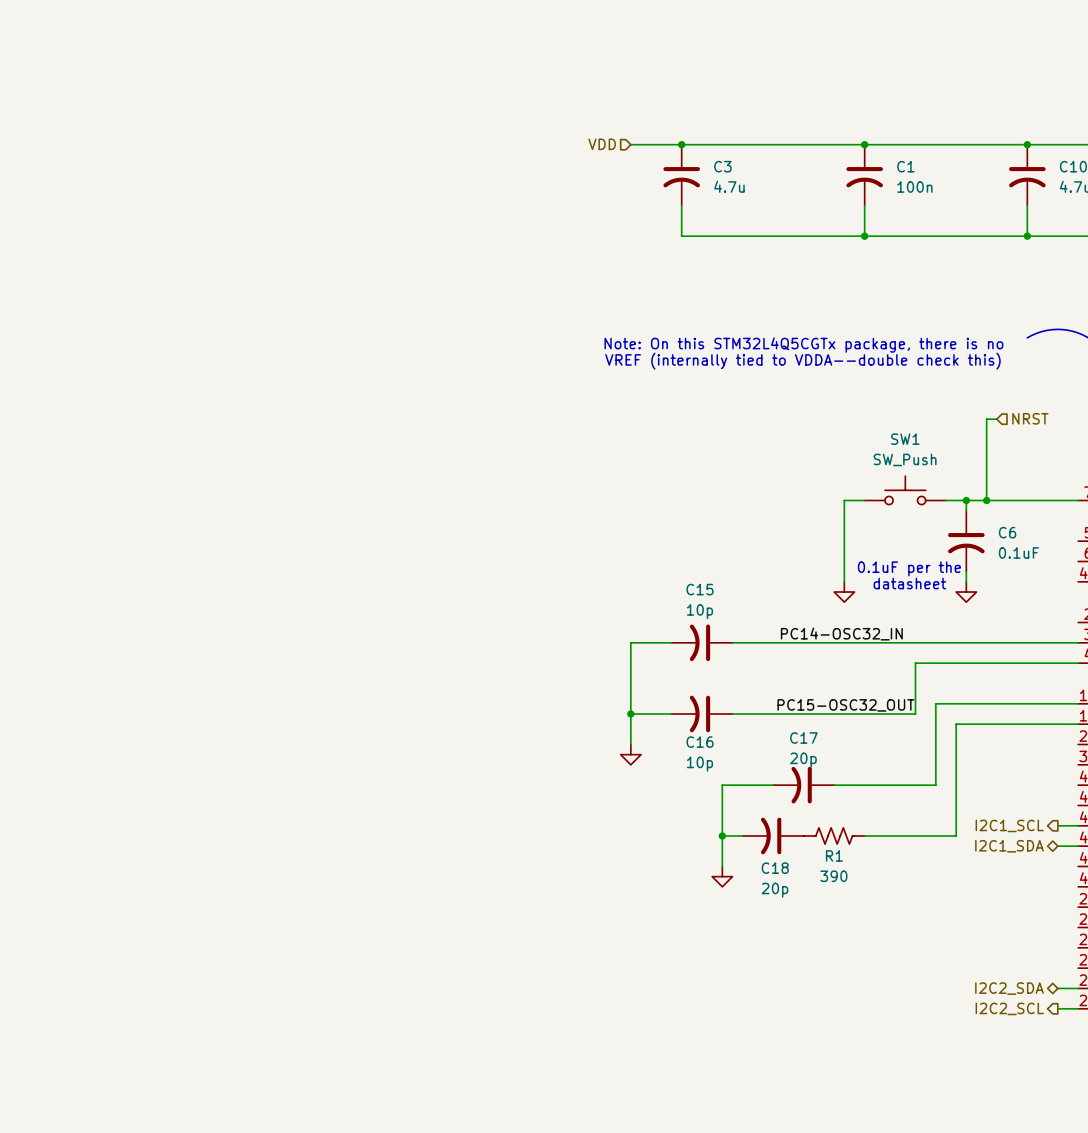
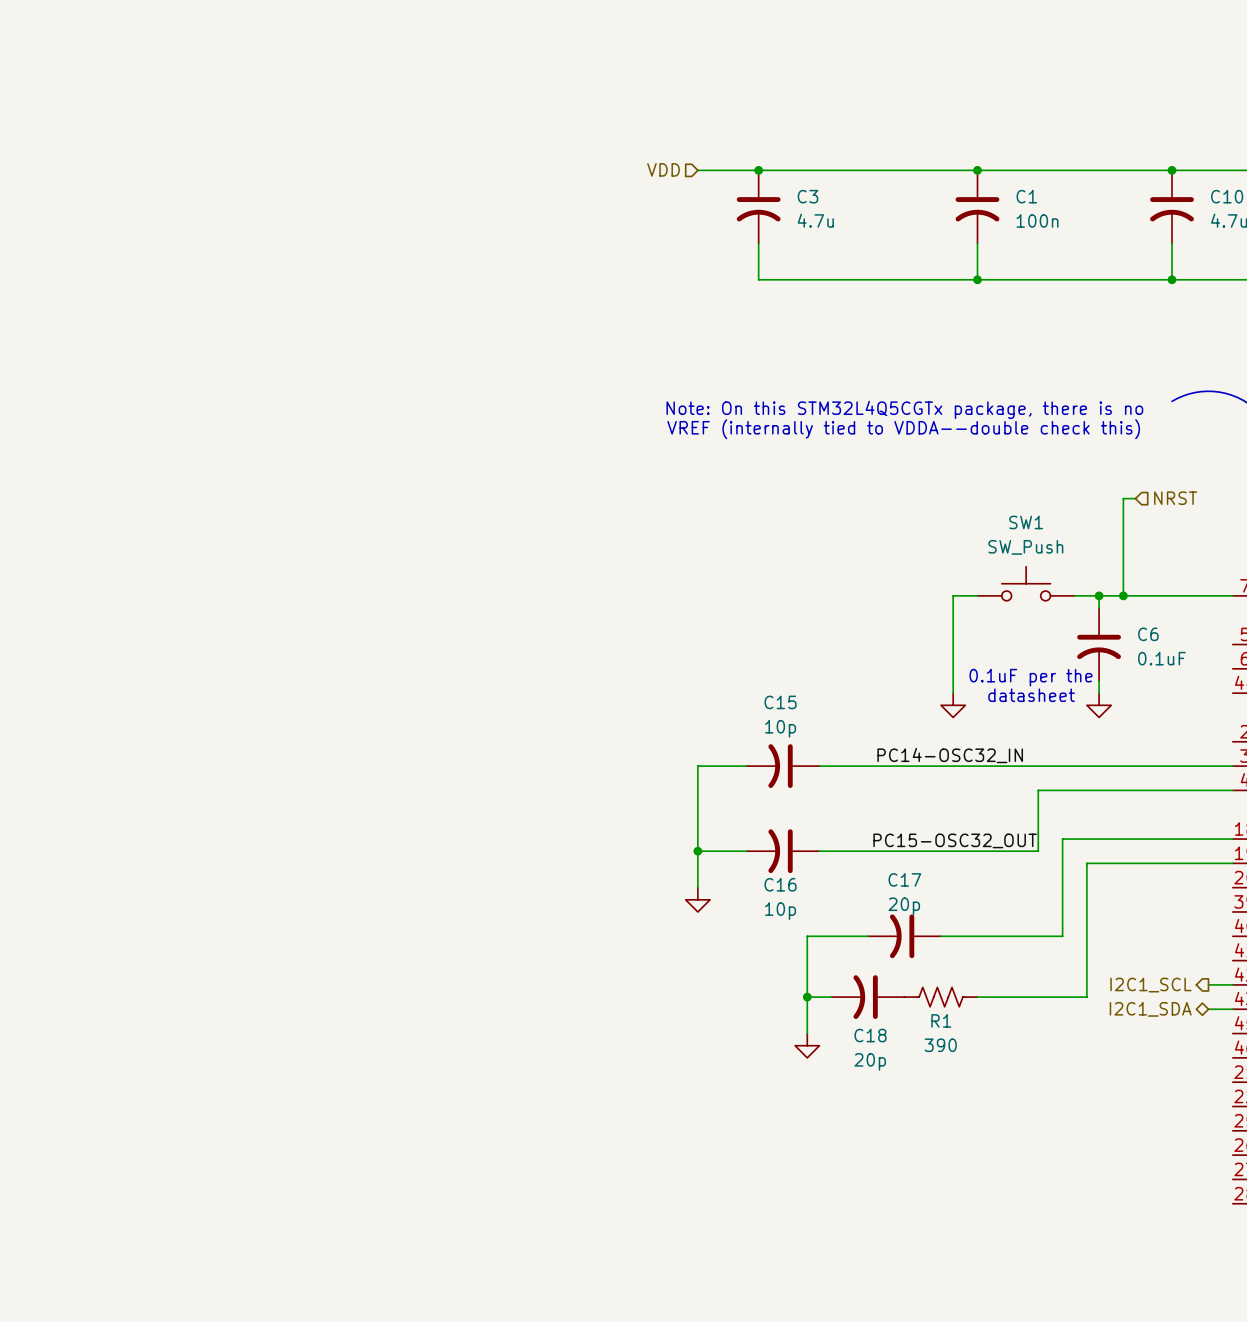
hierarchical label: I2C2_SDA (1009, 988) -> none
wire: (1057, 988) (1078, 988) -> none
hierarchical label: I2C2_SCL (1009, 1008) -> none
wire: (1057, 1008) (1078, 1008) -> none

